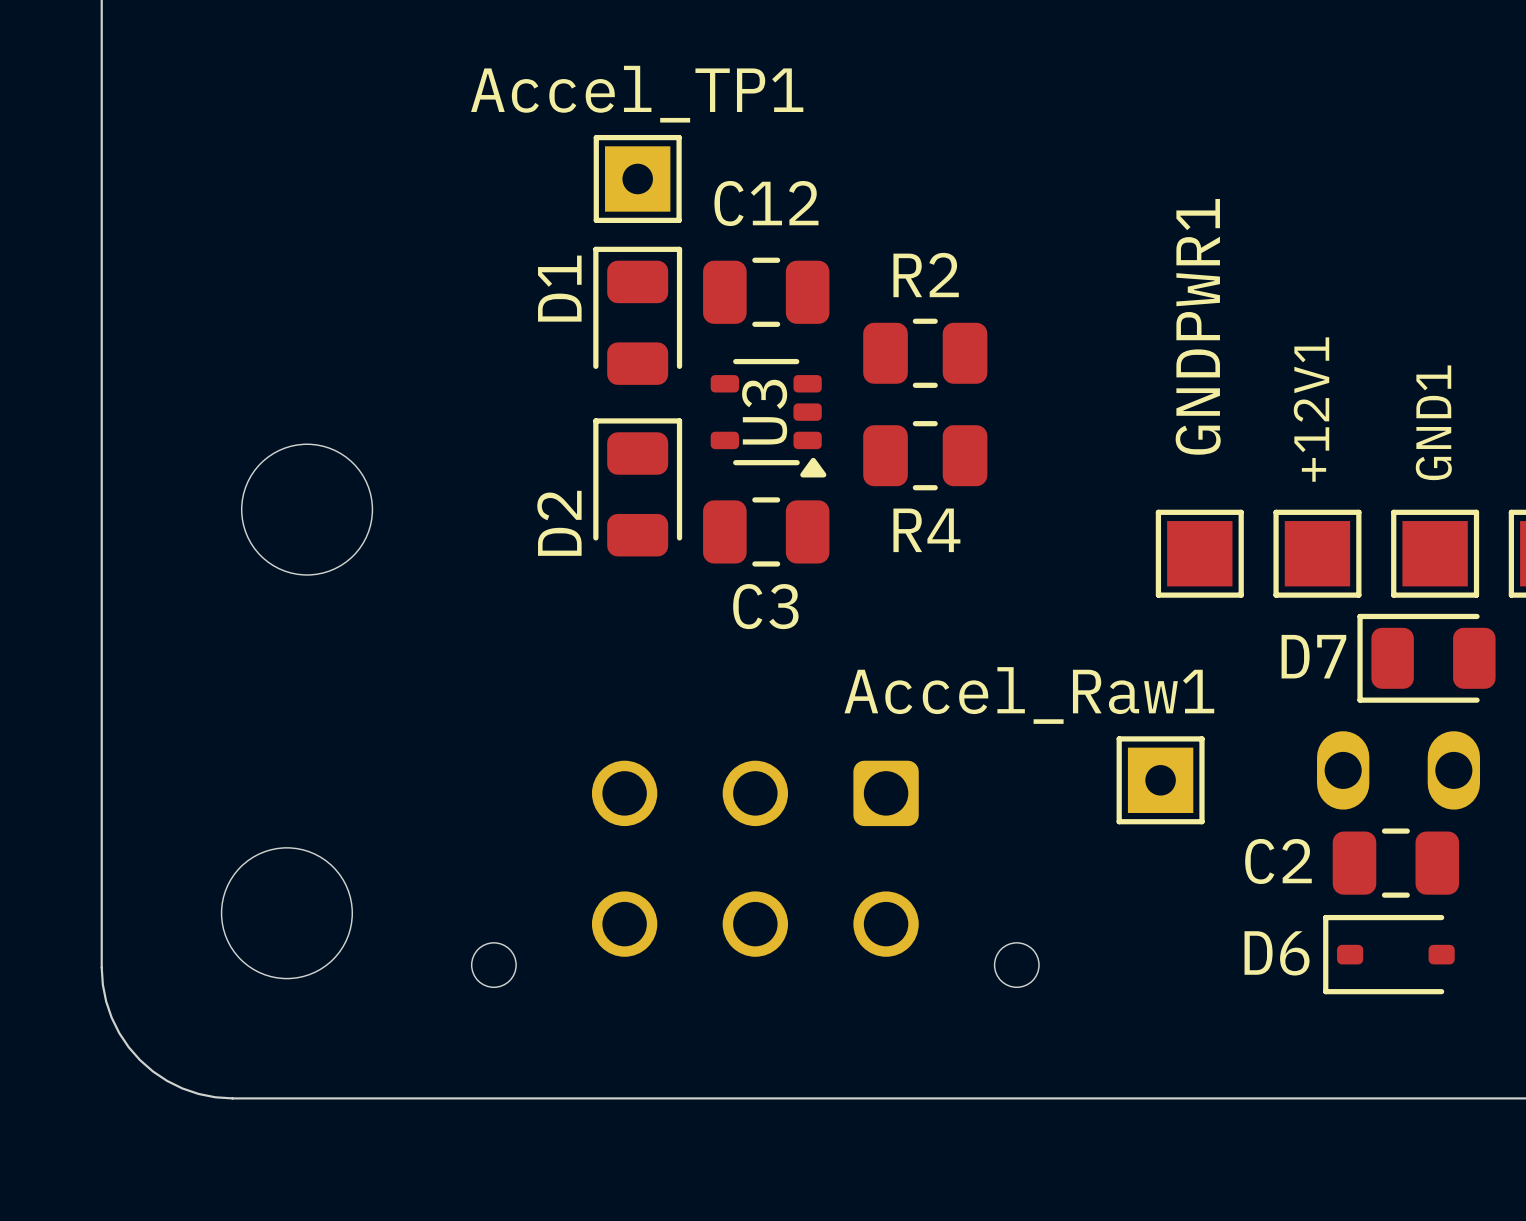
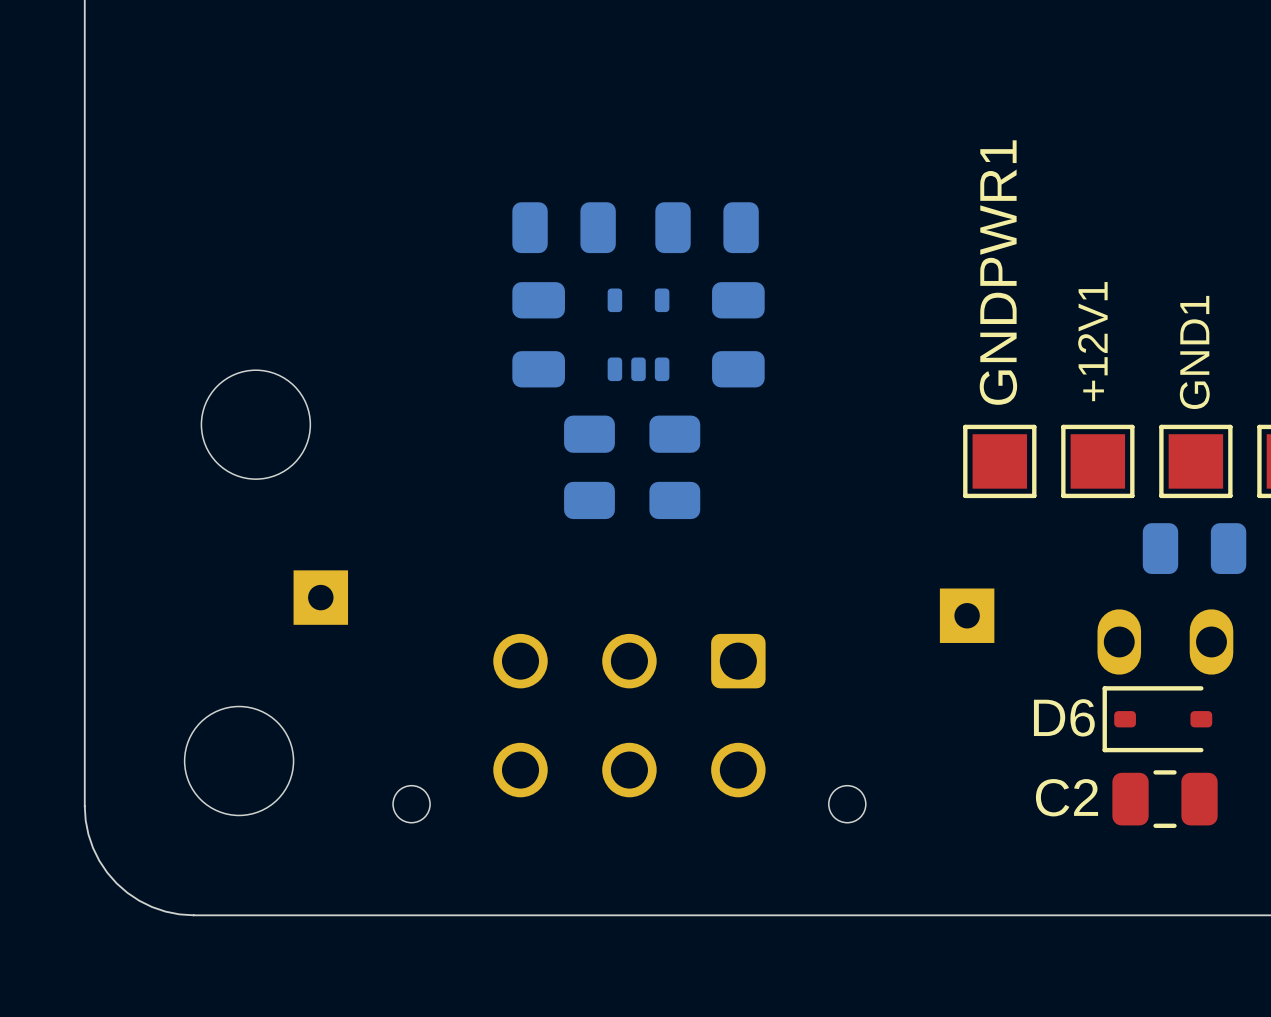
Accel_TP1 side: top (637, 178) -> bottom (320, 597)
C12 side: top (766, 292) -> bottom (538, 334)
D1 side: top (637, 315) -> bottom (564, 227)
R2 side: top (925, 353) -> bottom (589, 467)
U3 side: top (768, 418) -> bottom (638, 334)
R4 side: top (925, 455) -> bottom (674, 467)
D2 side: top (637, 487) -> bottom (707, 227)
C3 side: top (766, 531) -> bottom (738, 334)
D7 side: top (1426, 658) -> bottom (1194, 548)
Accel_Raw1 side: top (1160, 780) -> bottom (967, 615)
C2 position: (1395, 863) -> (1165, 799)
D6 position: (1388, 954) -> (1157, 719)

